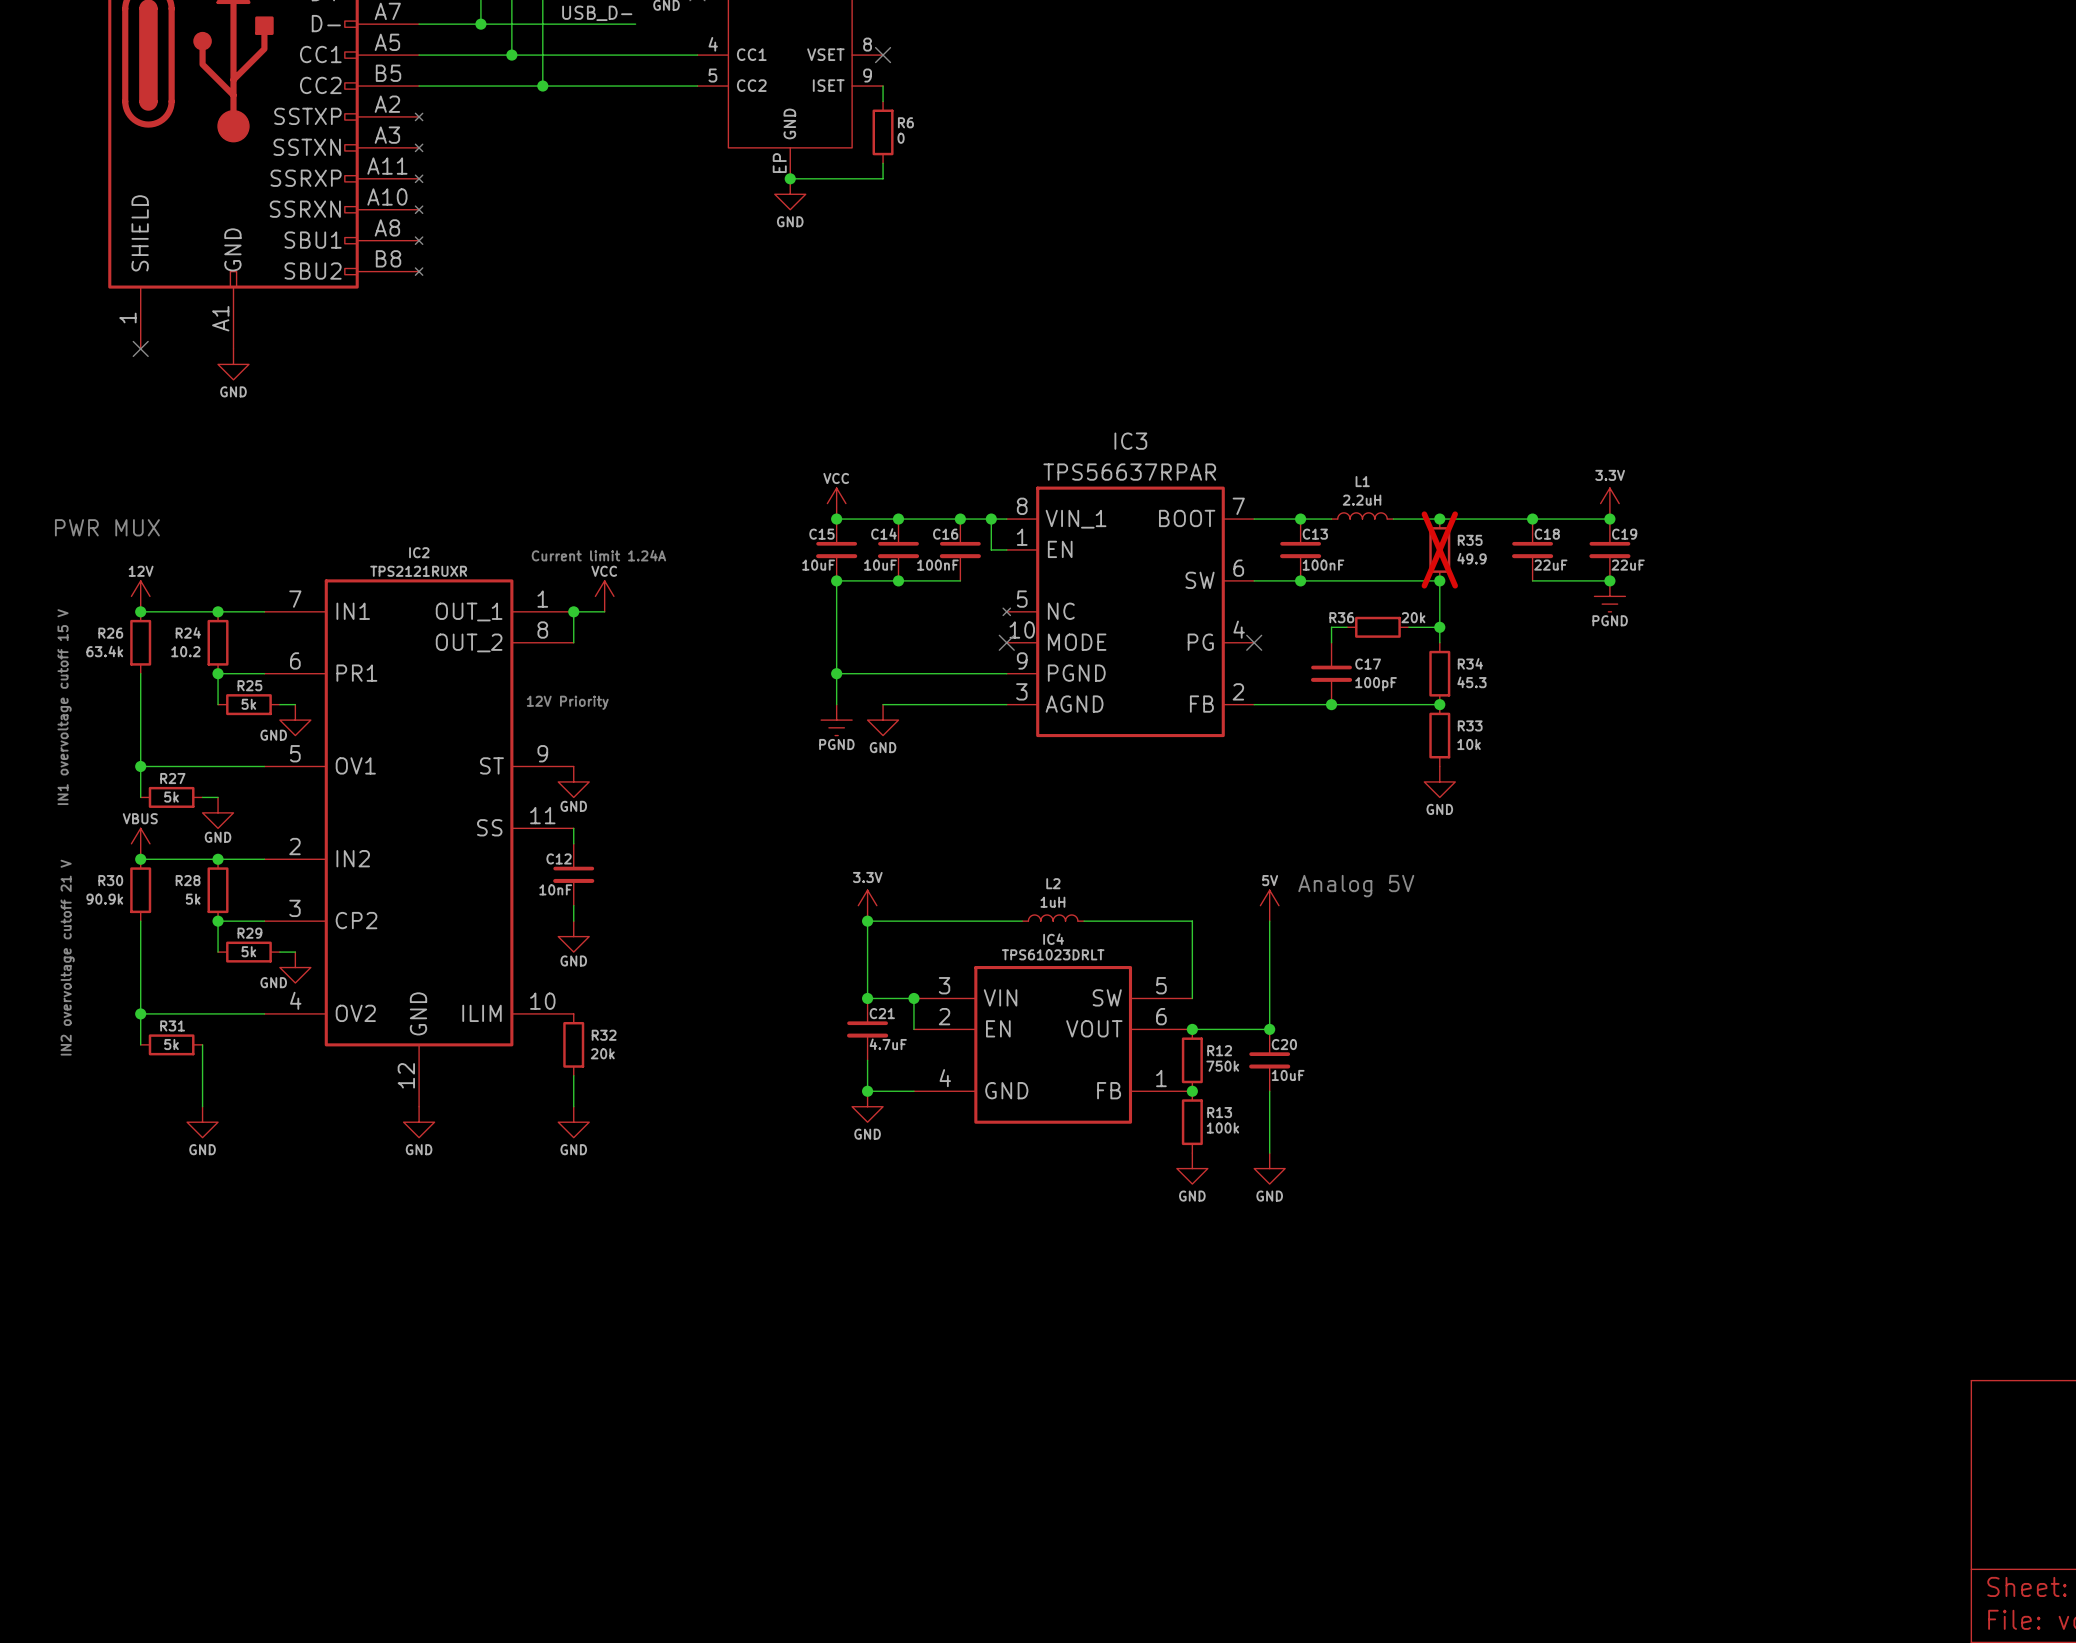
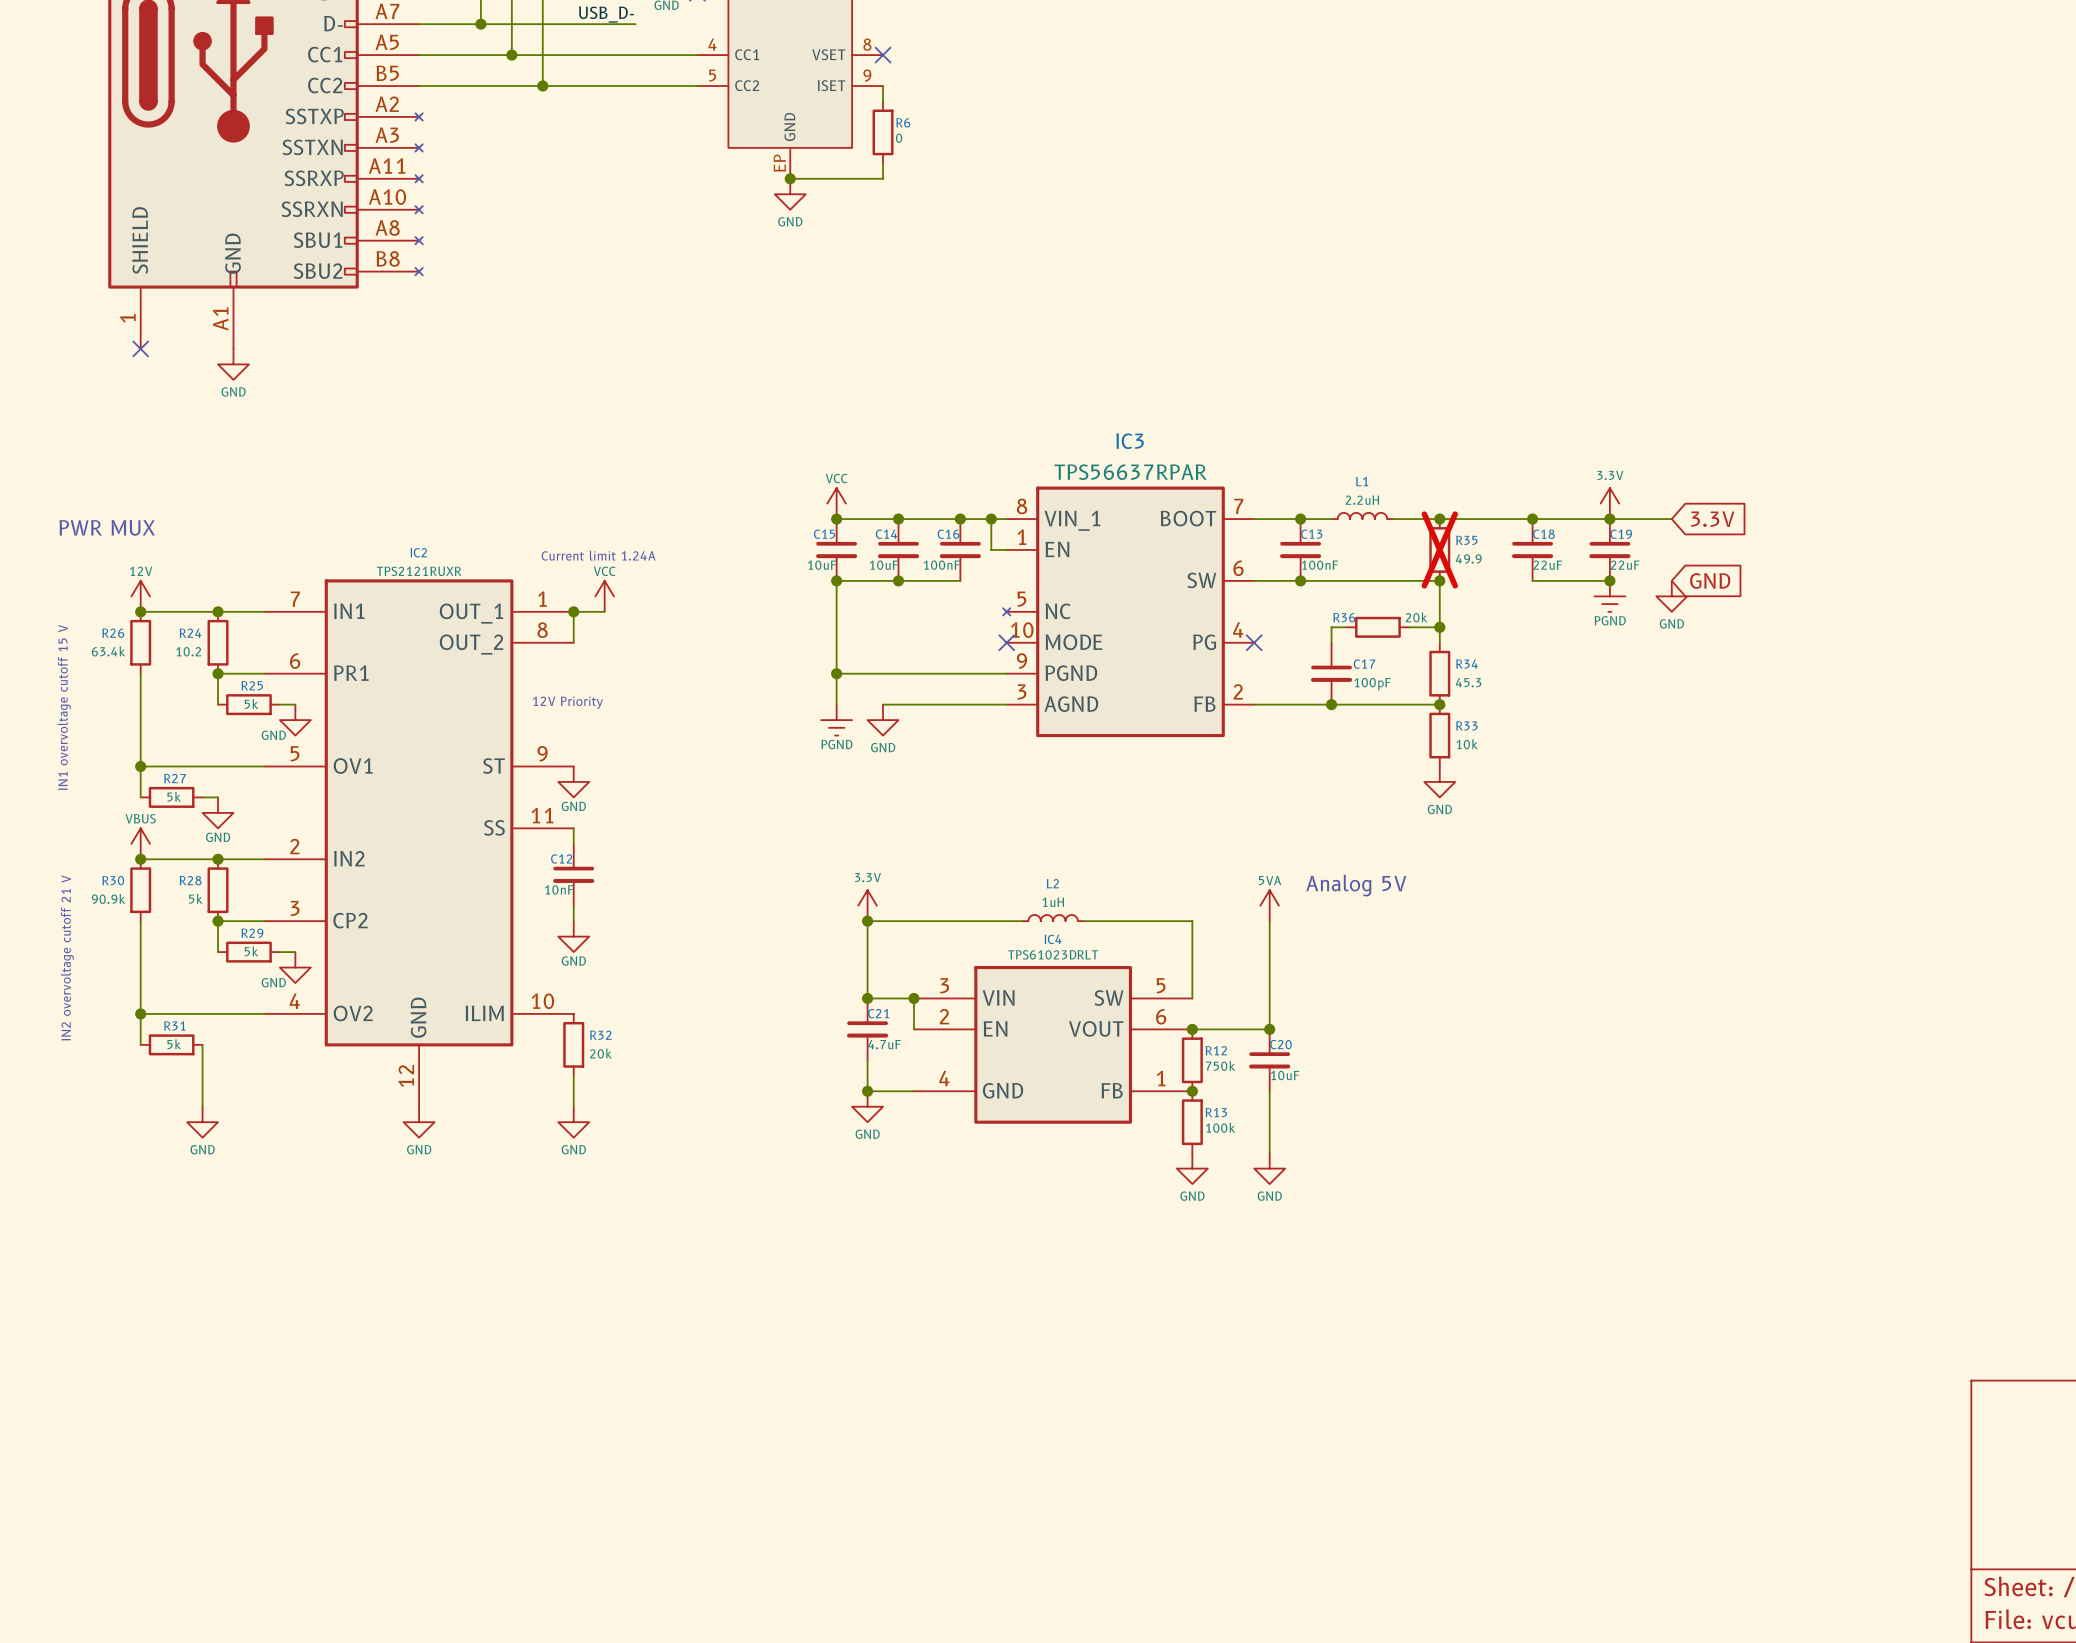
wire: none -> (1609, 519) (1671, 519)
global label: none -> 3.3V (1712, 519)
global label: none -> GND (1710, 580)
power symbol: none -> GND (1671, 596)
power symbol: 5V (1269, 905) -> 5VA (1269, 905)

